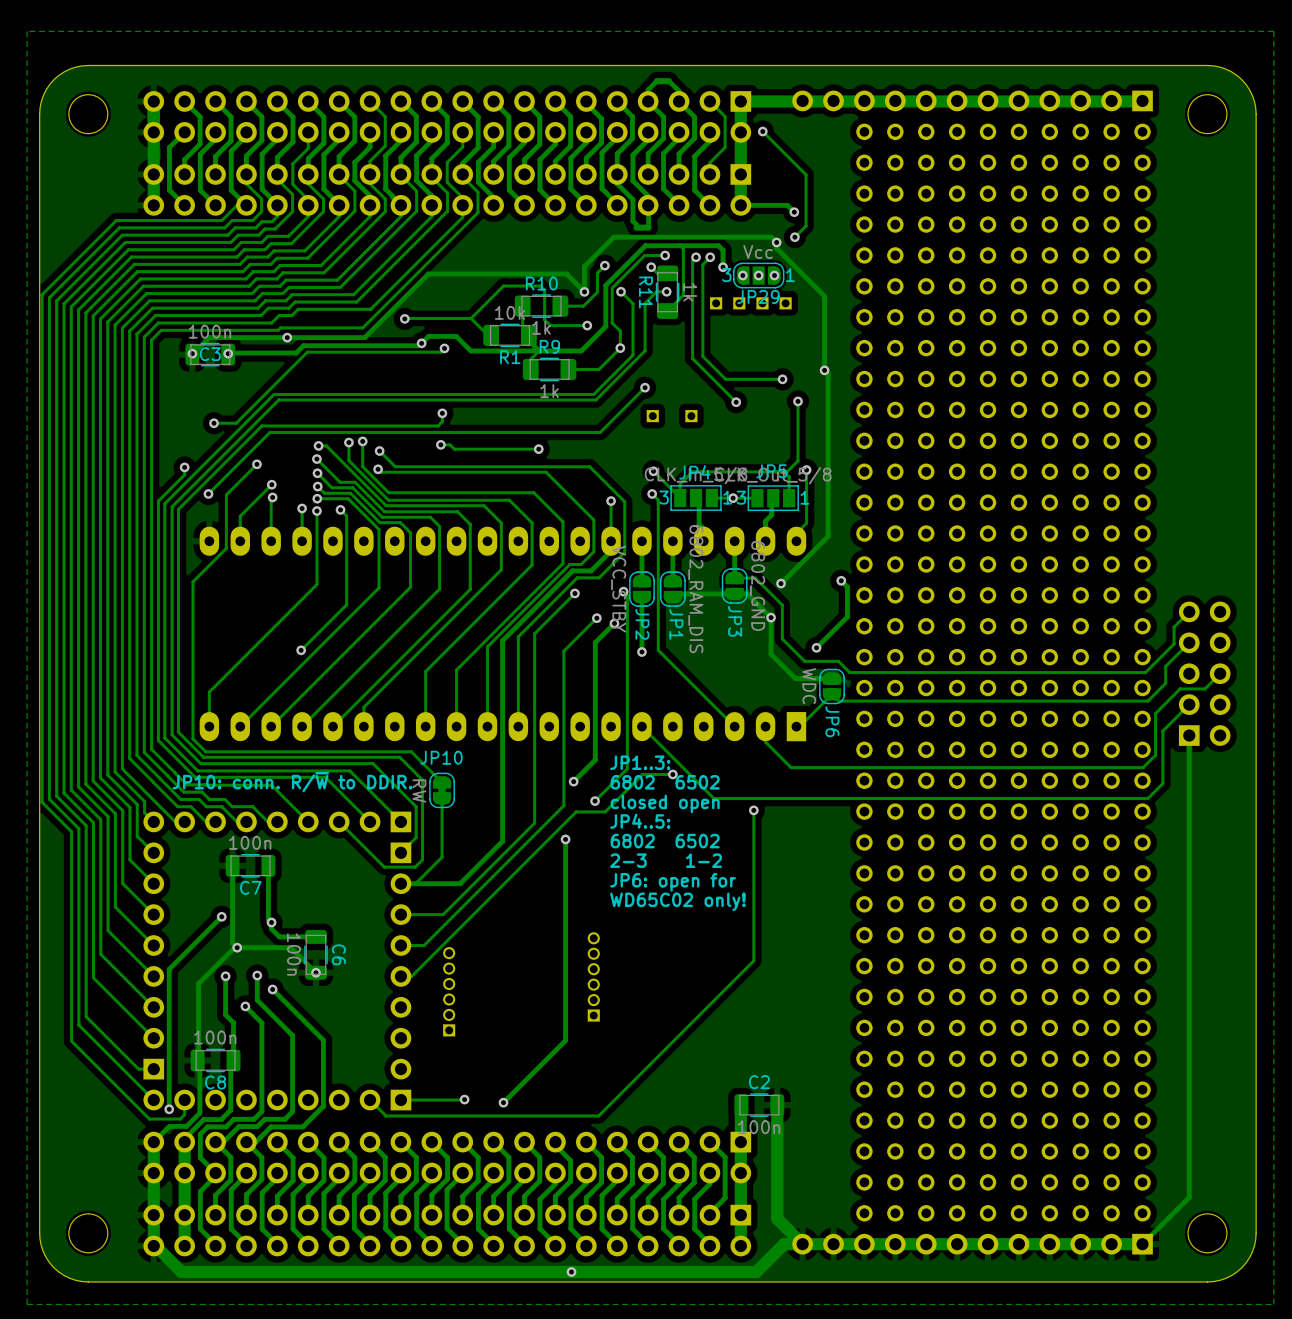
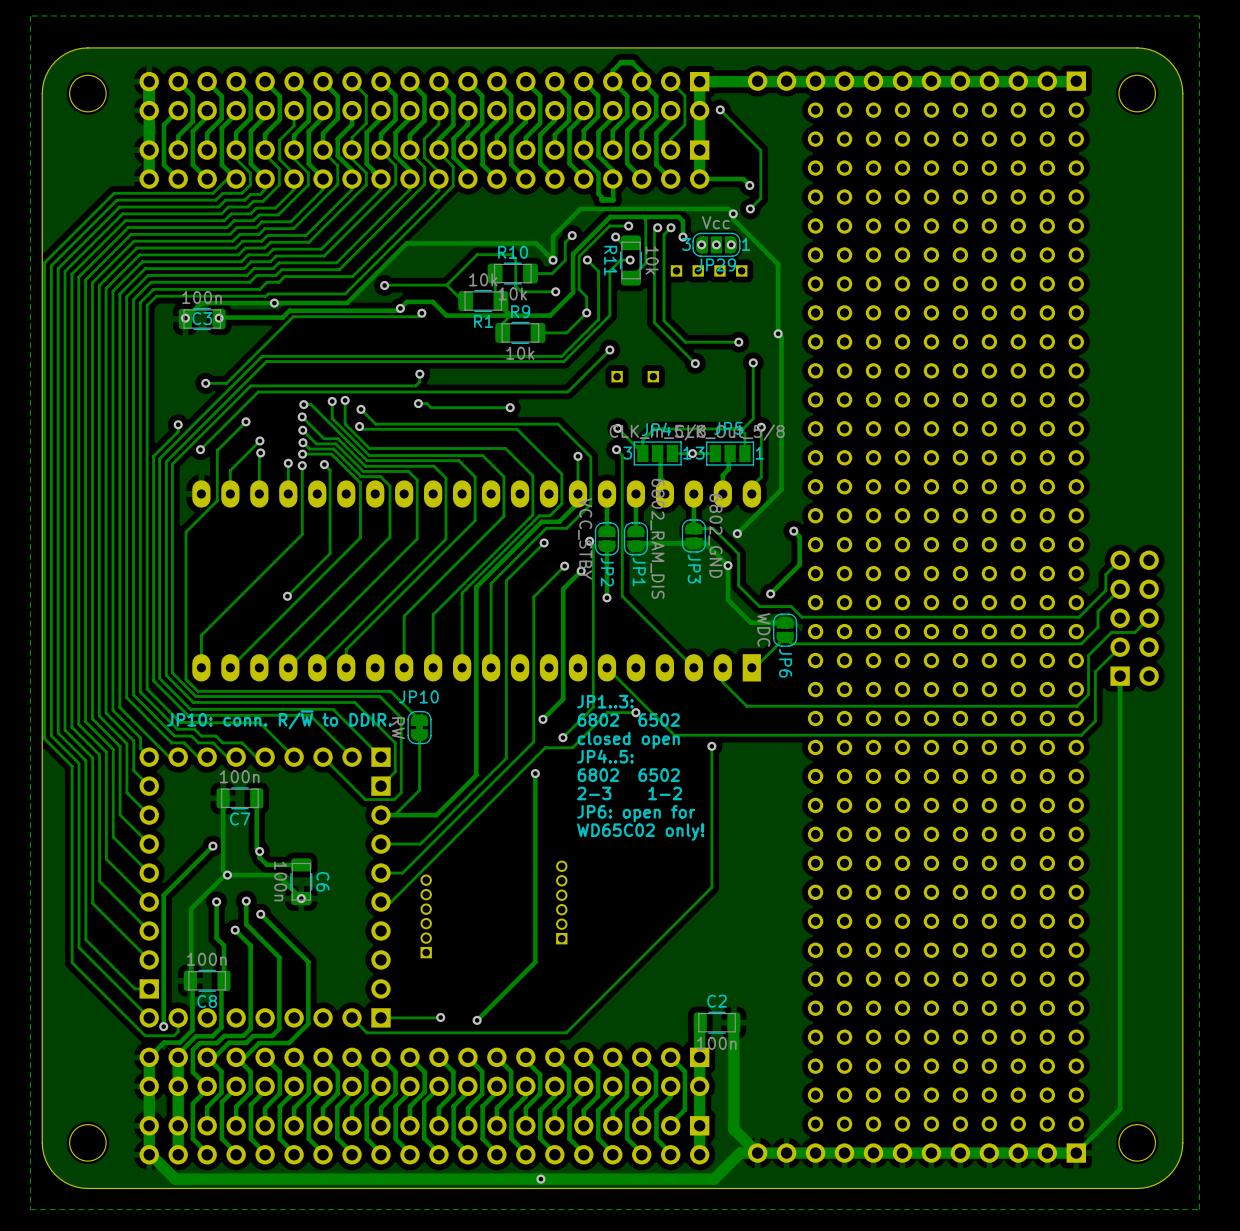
R11 value: 1k (690, 292) -> 10k (652, 260)
R10 value: 1k (541, 327) -> 10k (512, 293)
R9 value: 1k (549, 391) -> 10k (520, 353)

